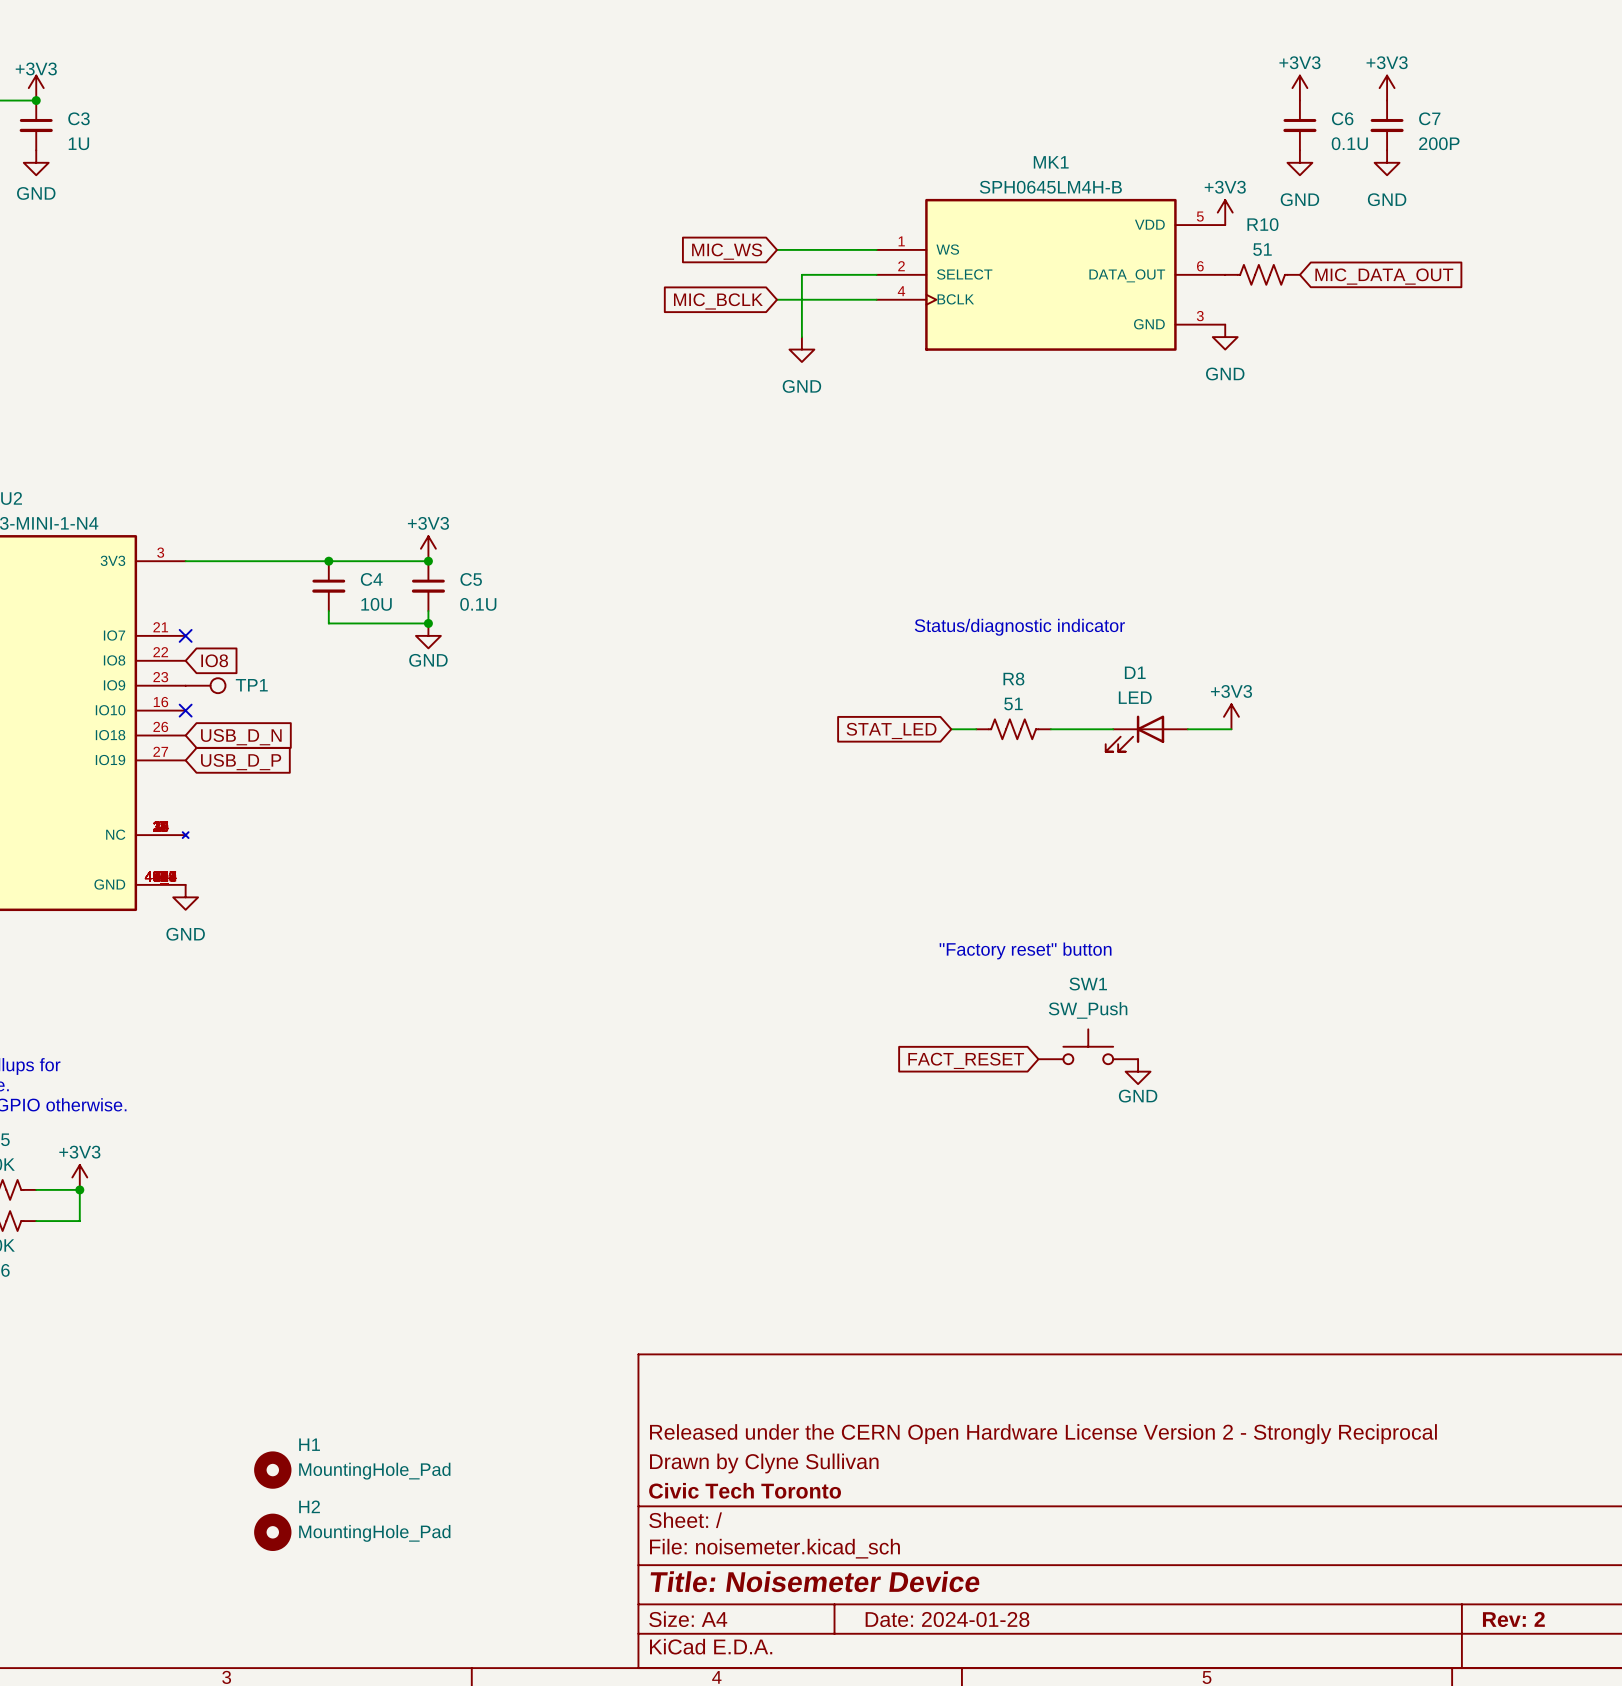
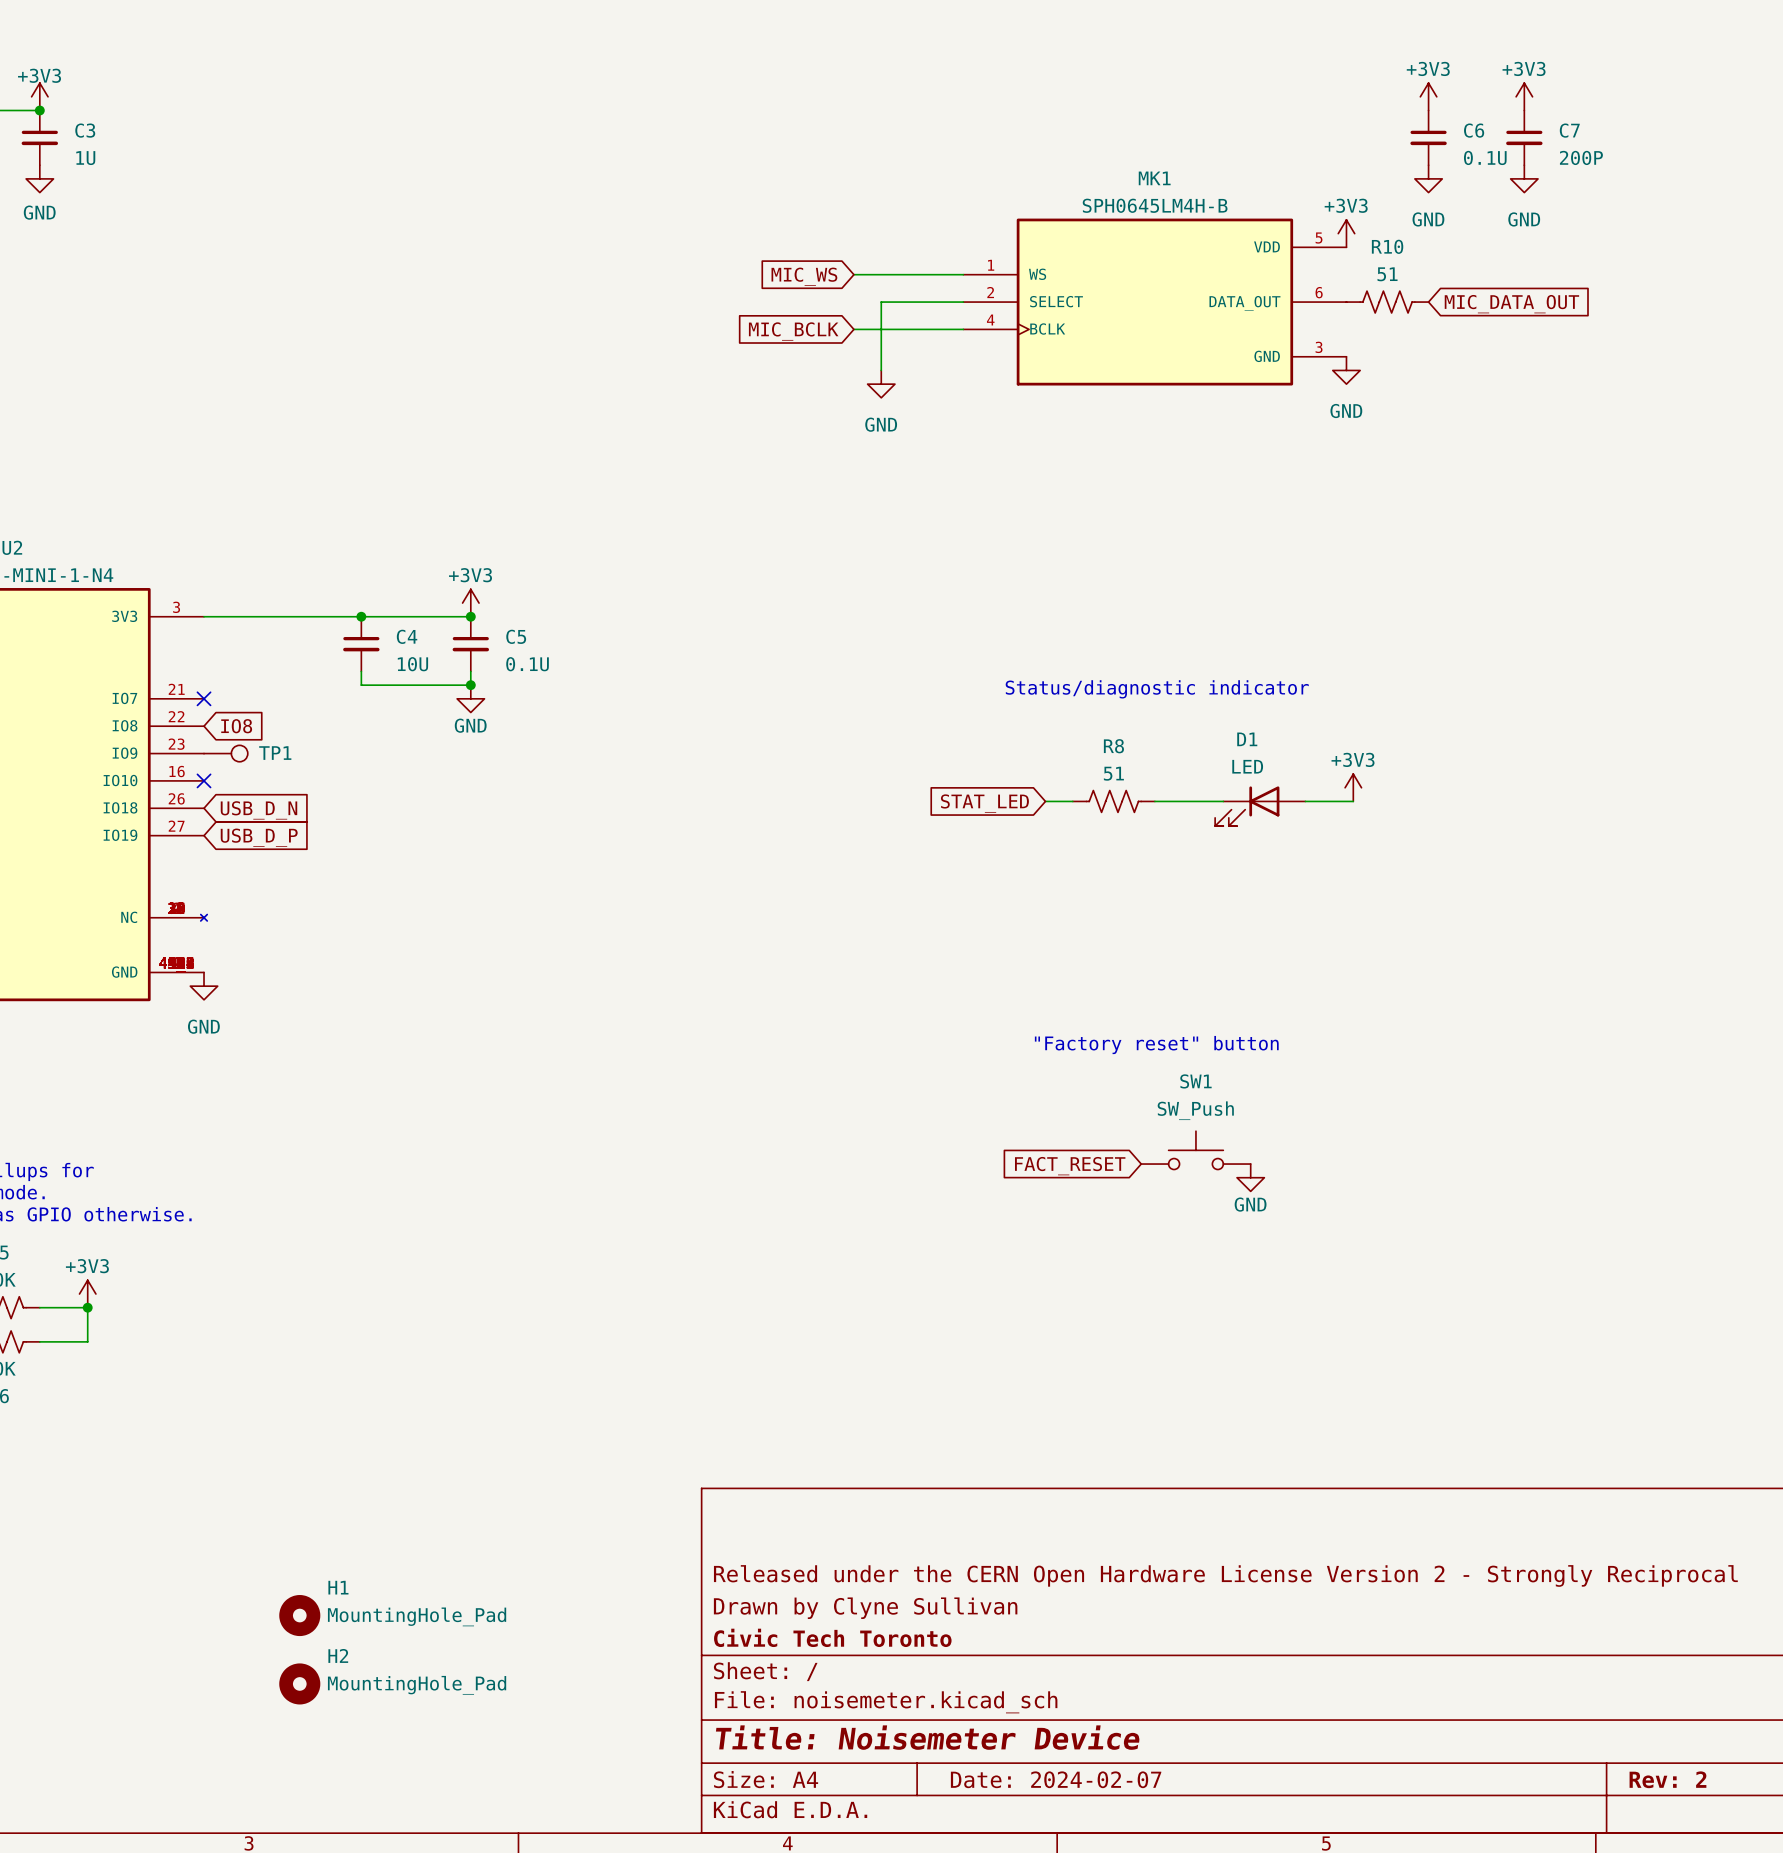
title block: Date: 2024-01-28 (947, 1619) -> Date: 2024-02-07 (1056, 1779)

